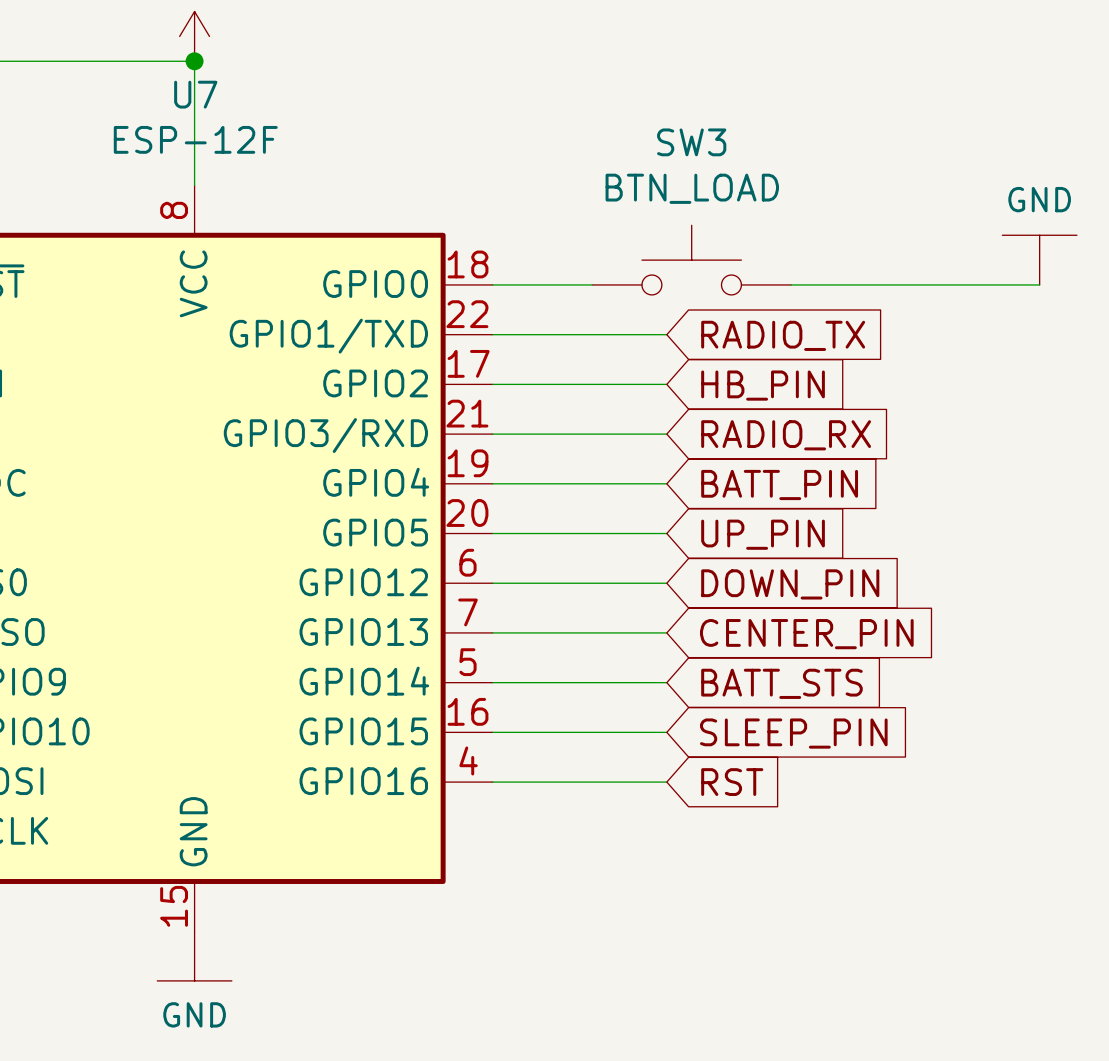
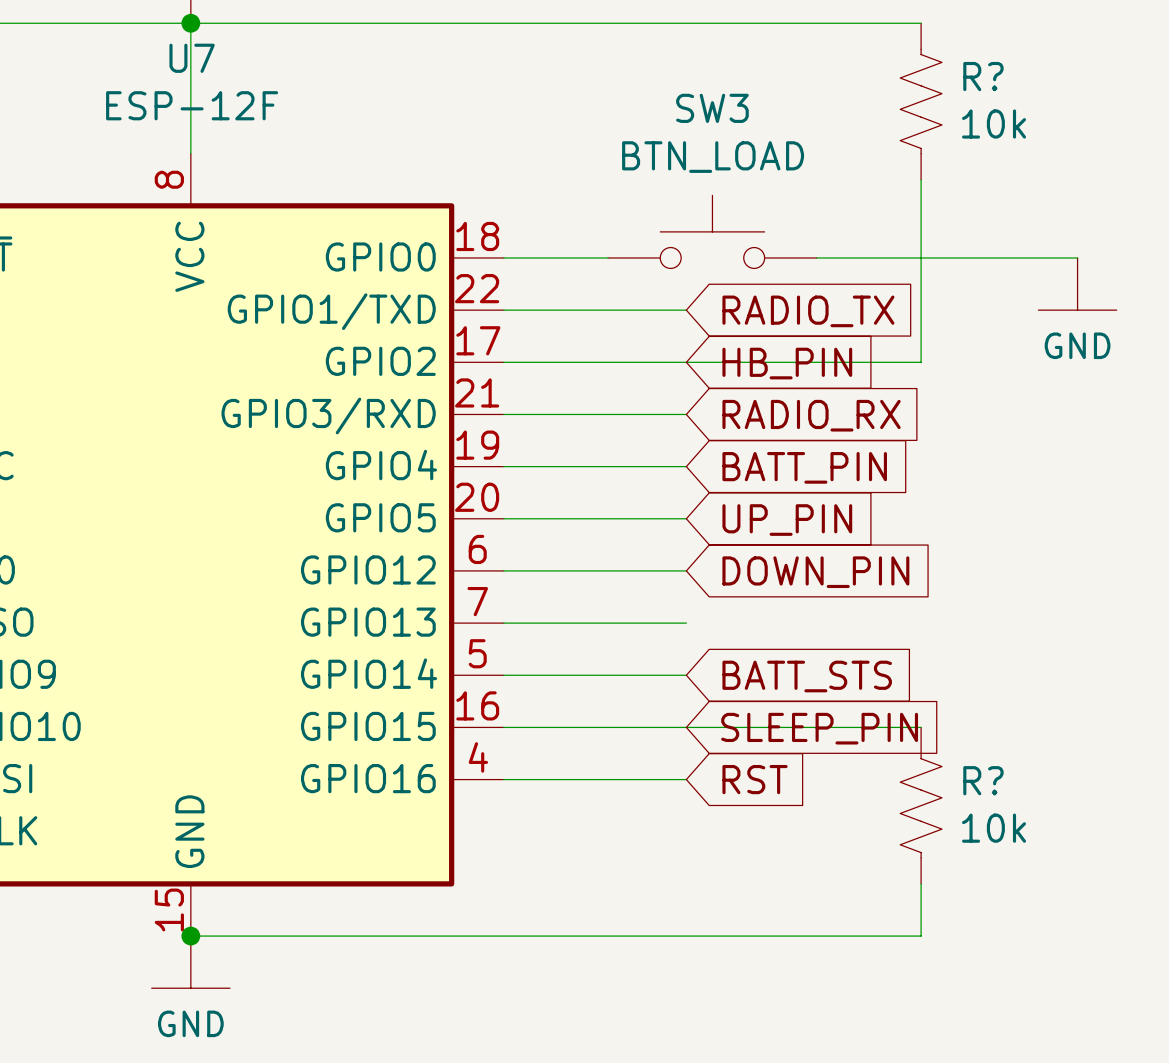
wire: none -> (190, 23) (921, 23)
R?: none -> 10k (921, 101)
wire: none -> (921, 179) (921, 362) (686, 362)
power symbol rotation: 0° (1039, 260) -> 180° (1077, 284)
power symbol position: GND (1039, 260) -> GND (1077, 284)
global label: CENTER_PIN (806, 634) -> none
wire: none -> (686, 727) (921, 727)
R?: none -> 10k (921, 805)
wire: none -> (921, 883) (921, 936) (190, 936)
junction: none -> (190, 936)

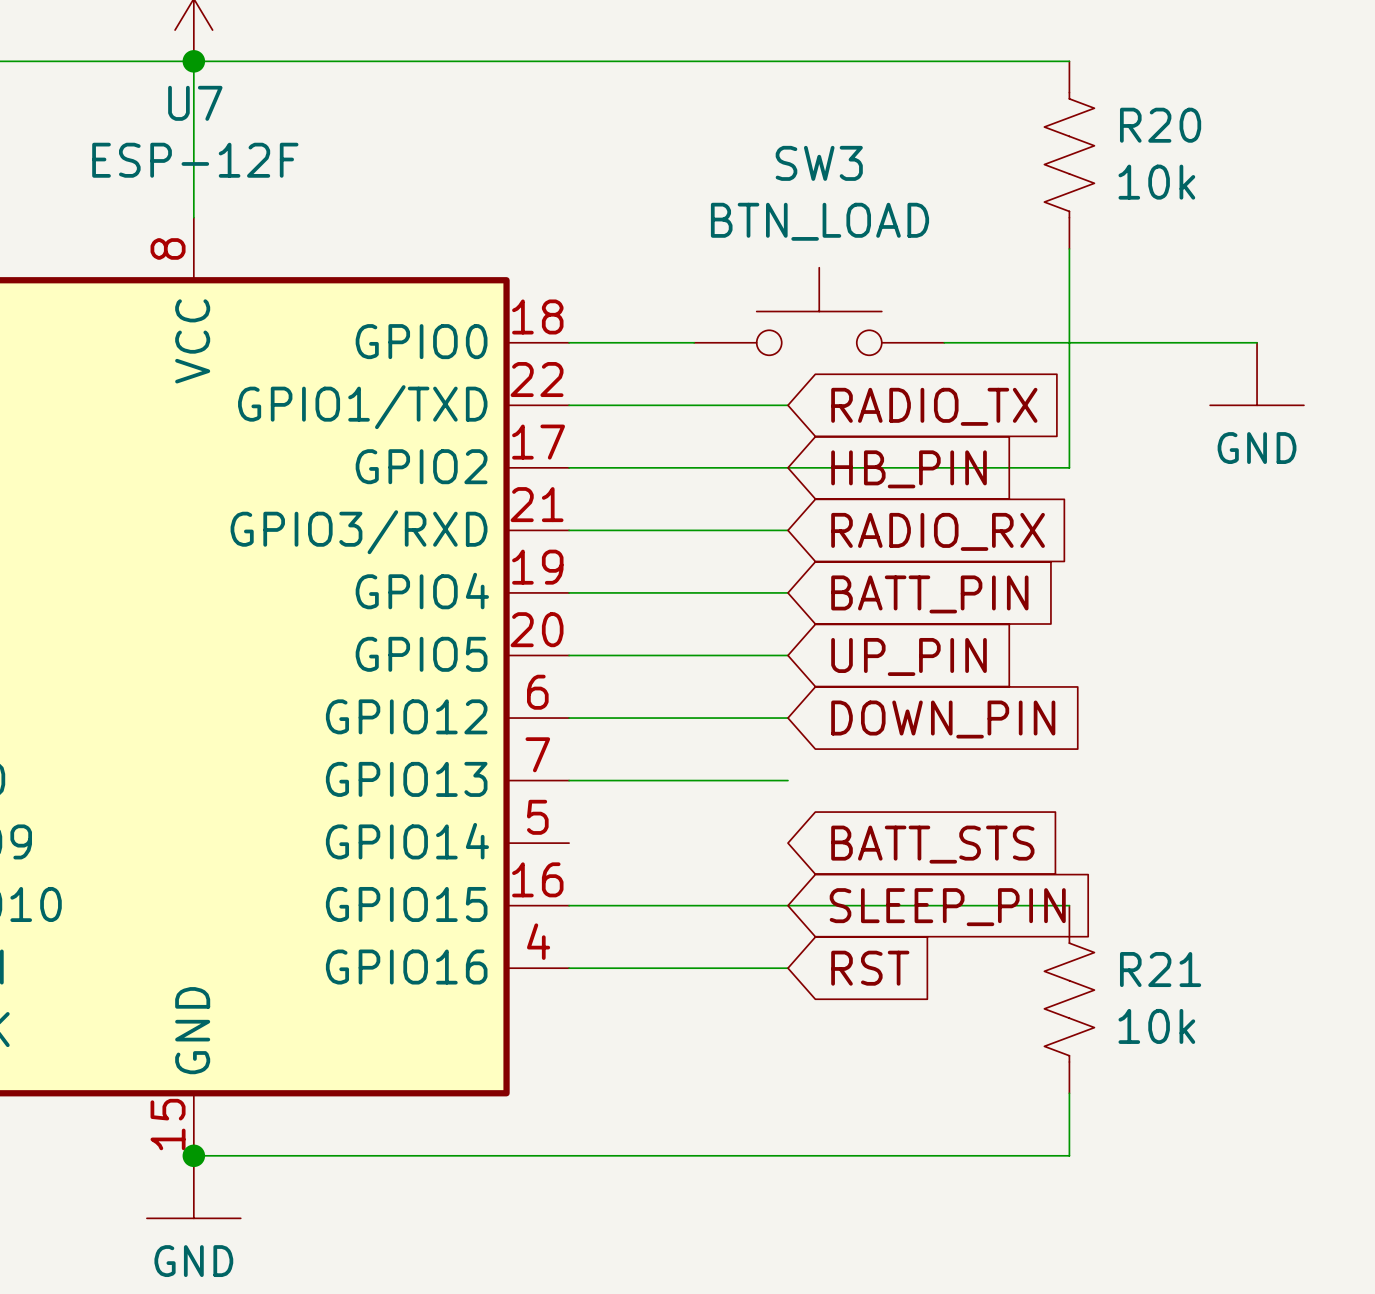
R? name: R? (983, 76) -> R20 (1160, 125)
wire: (503, 675) (686, 675) -> none
R? name: R? (983, 780) -> R21 (1160, 969)

